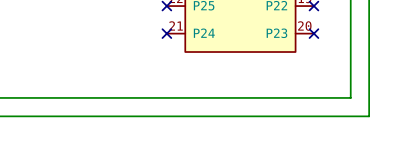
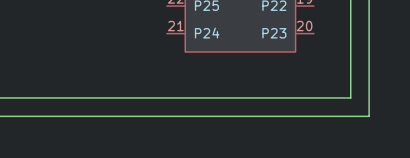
no-connect mark: (166, 6) -> none
no-connect mark: (313, 6) -> none
no-connect mark: (166, 33) -> none
no-connect mark: (313, 33) -> none

